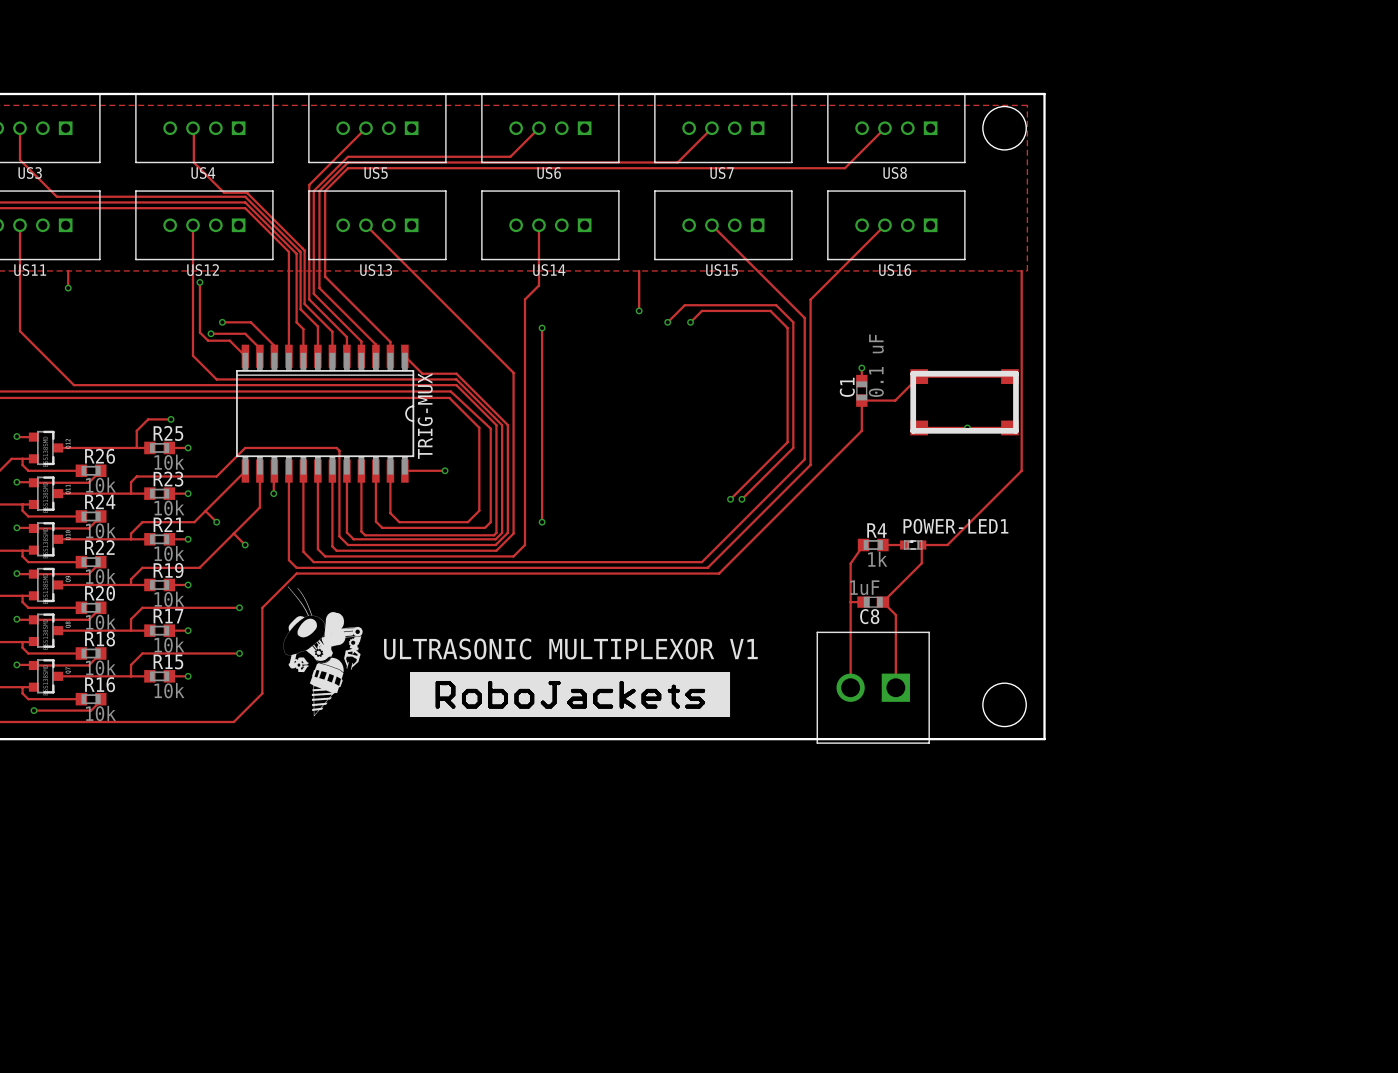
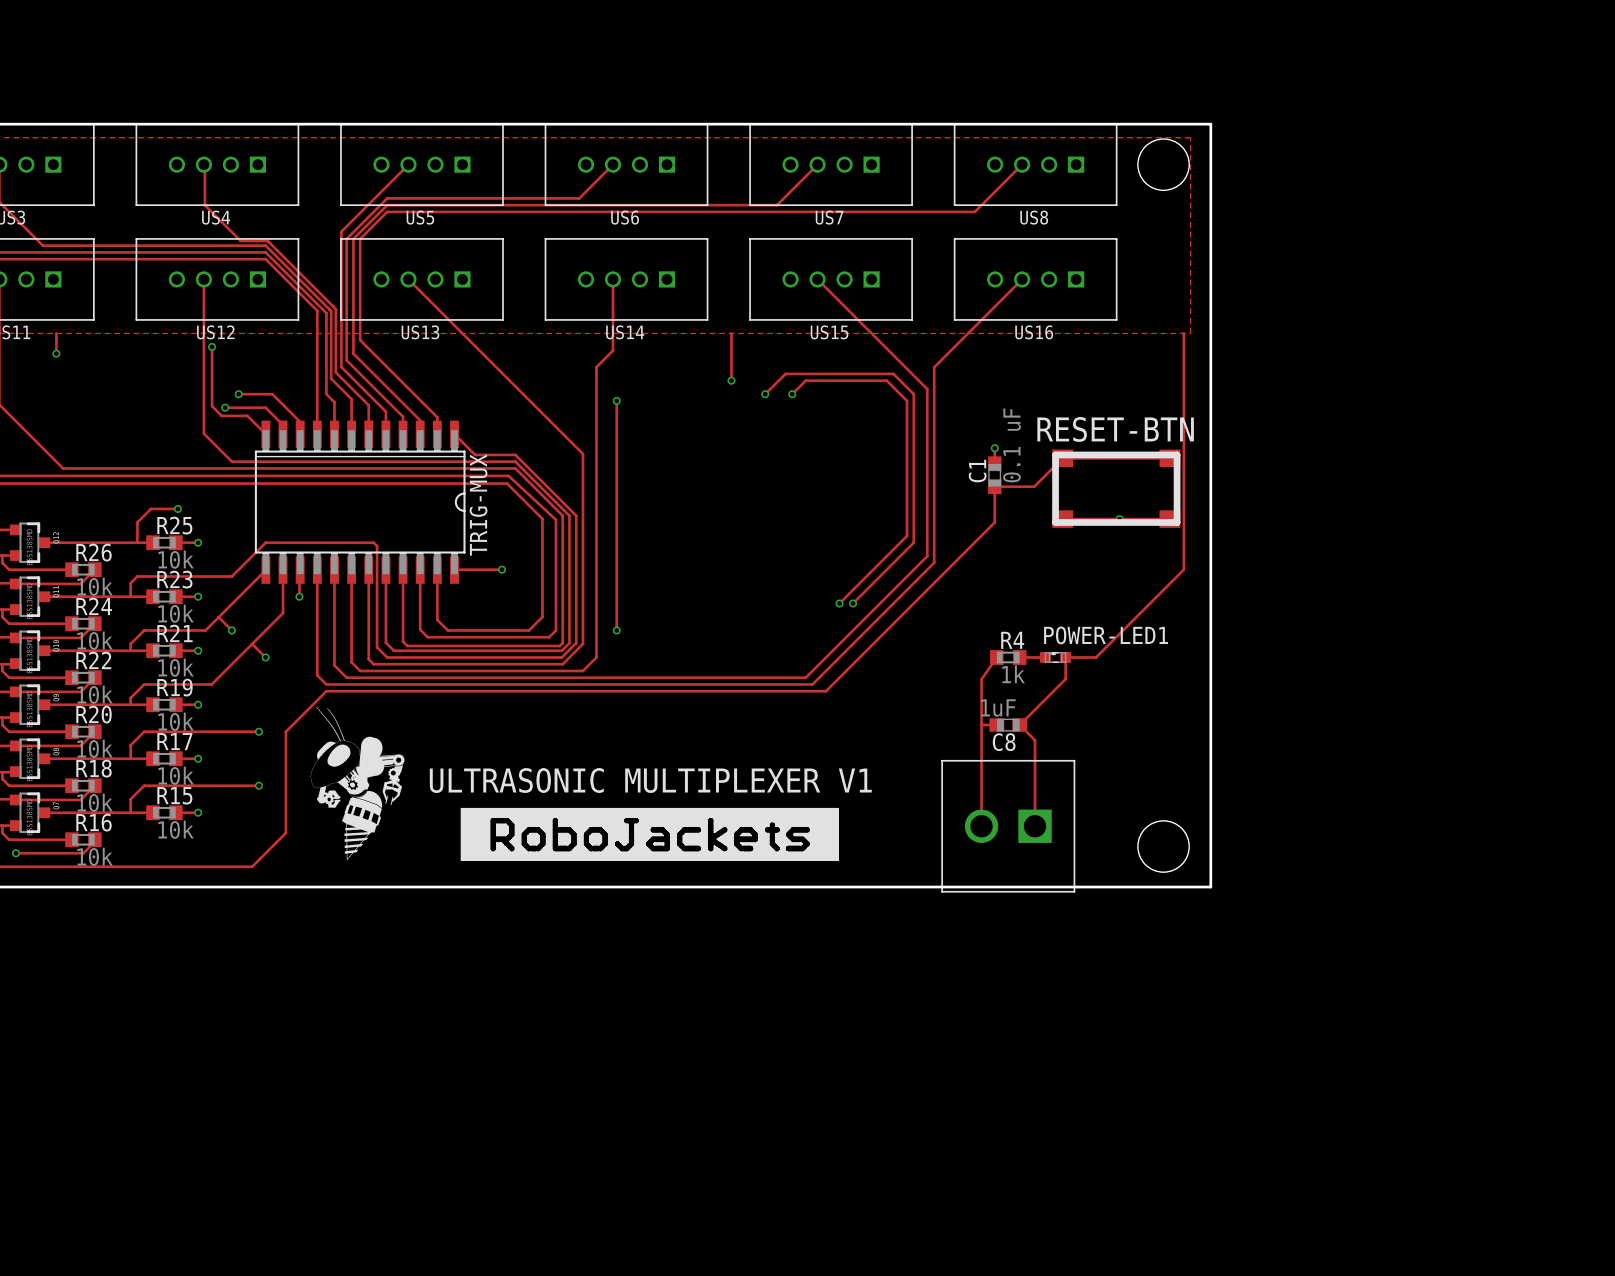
text: none -> RESET-BTN (1115, 429)
text: ULTRASONIC MULTIPLEXOR V1 (570, 649) -> ULTRASONIC MULTIPLEXER V1 (650, 780)

